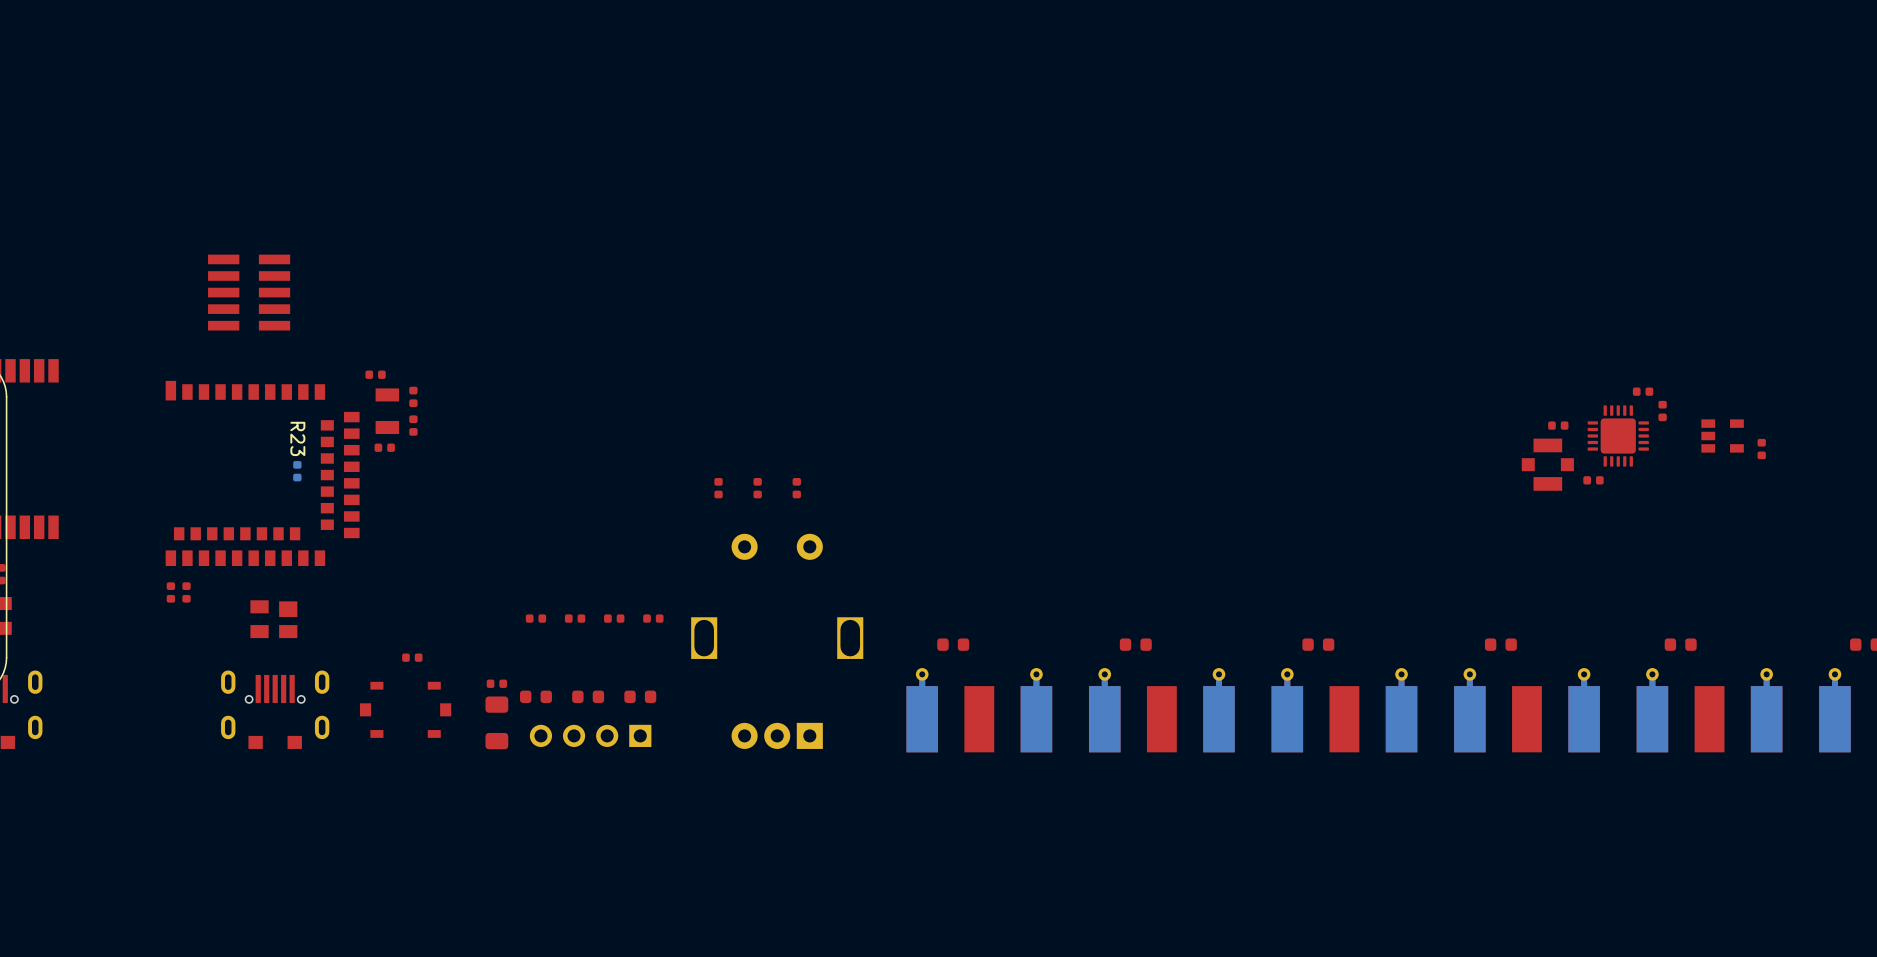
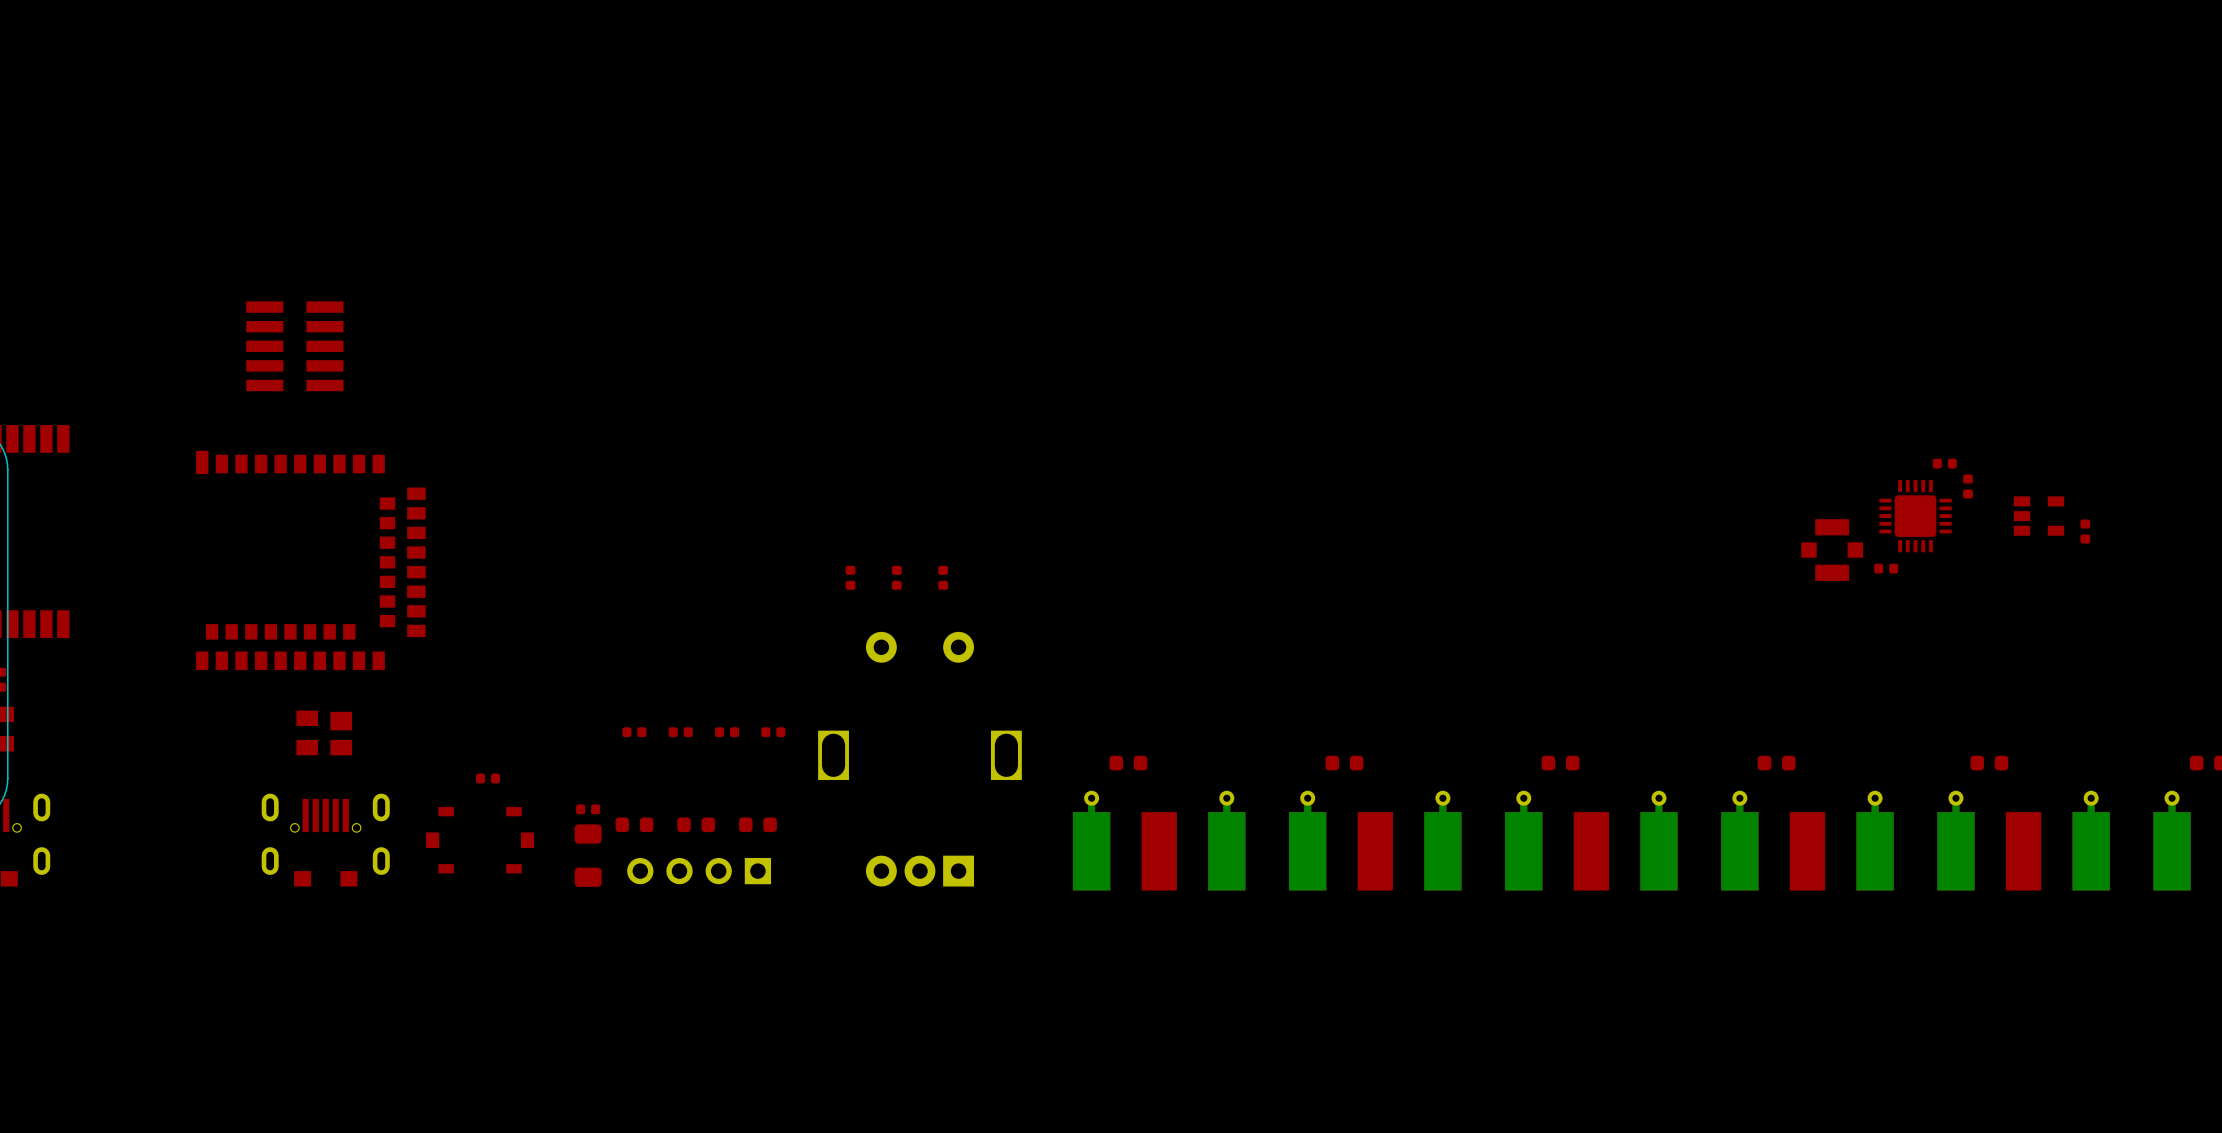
part: (375, 374) -> none
part: (413, 396) -> none
part: (387, 411) -> none
part: (413, 425) -> none
part: (1558, 425) -> none
part: (384, 447) -> none
R23: (297, 471) -> none
part: (170, 592) -> none
part: (186, 592) -> none

